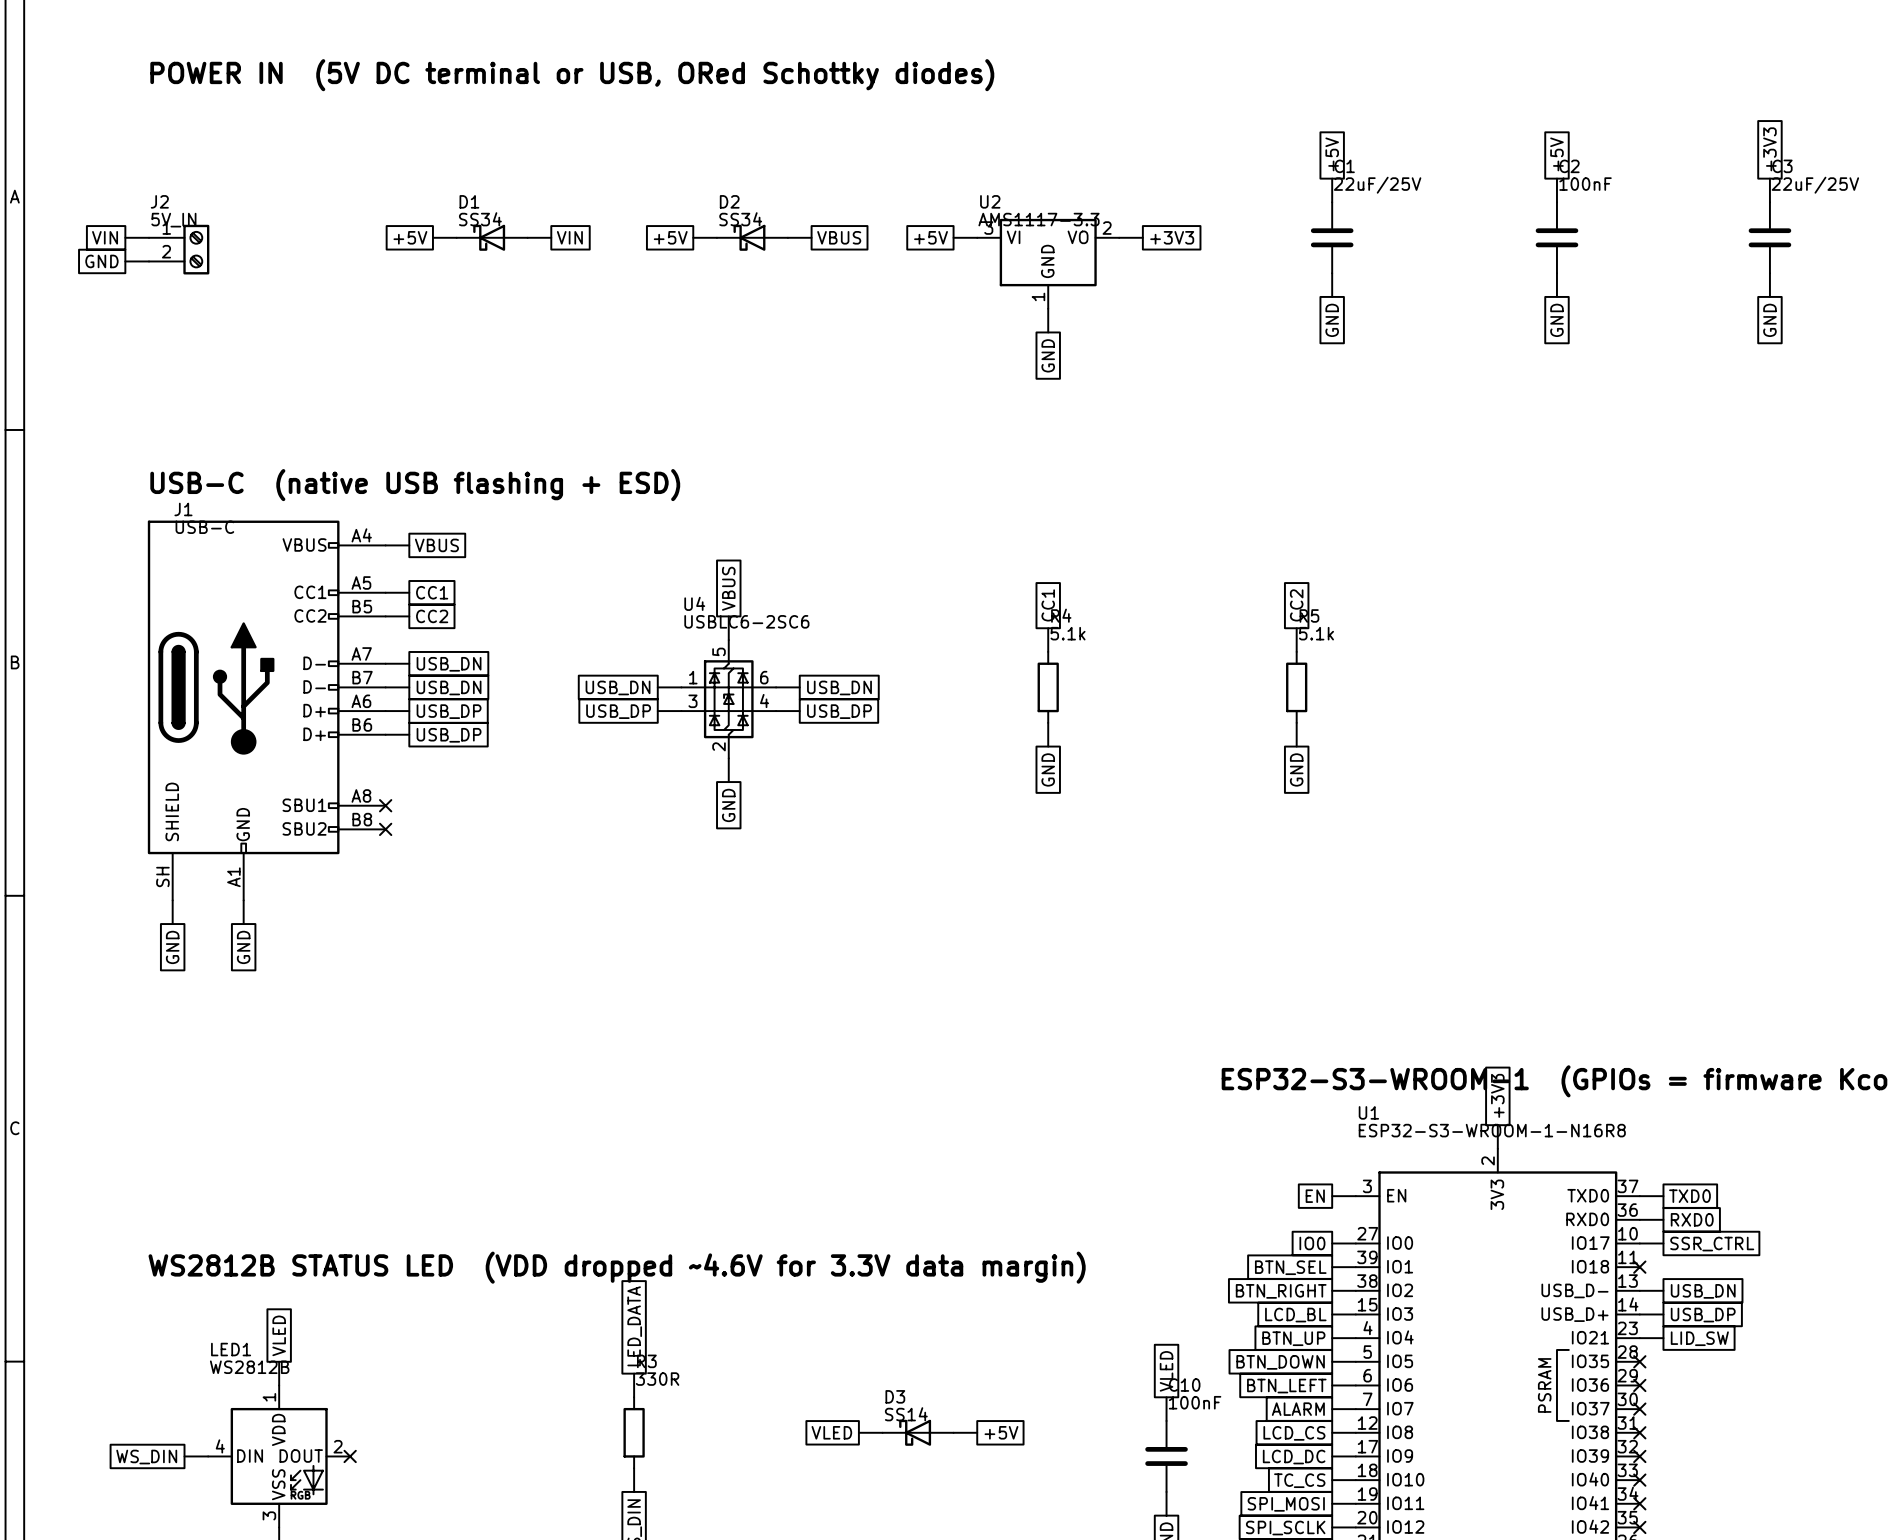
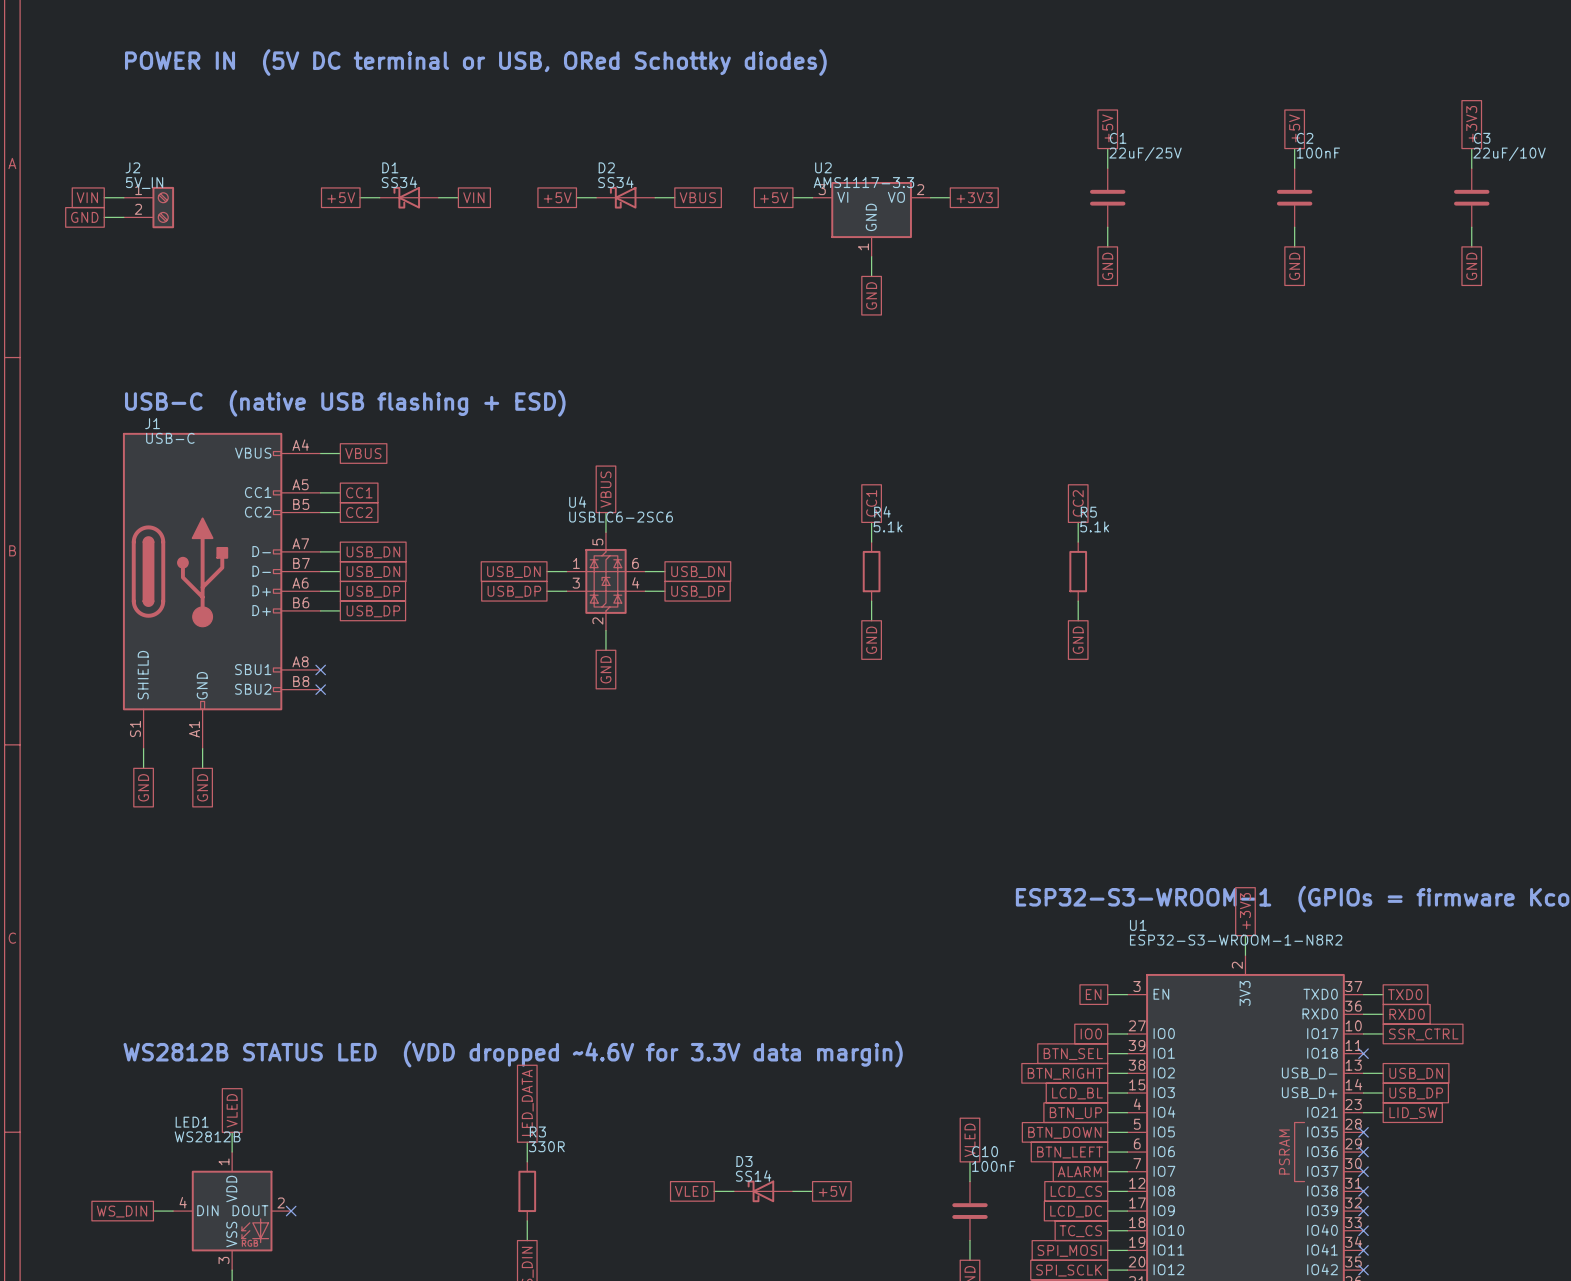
C3 value: 22uF/25V (1815, 185) -> 22uF/10V (1509, 153)
J1 pin number: SH (162, 876) -> S1 (135, 728)
U1 value: ESP32-S3-WROOM-1-N16R8 (1492, 1130) -> ESP32-S3-WROOM-1-N8R2 (1236, 940)

